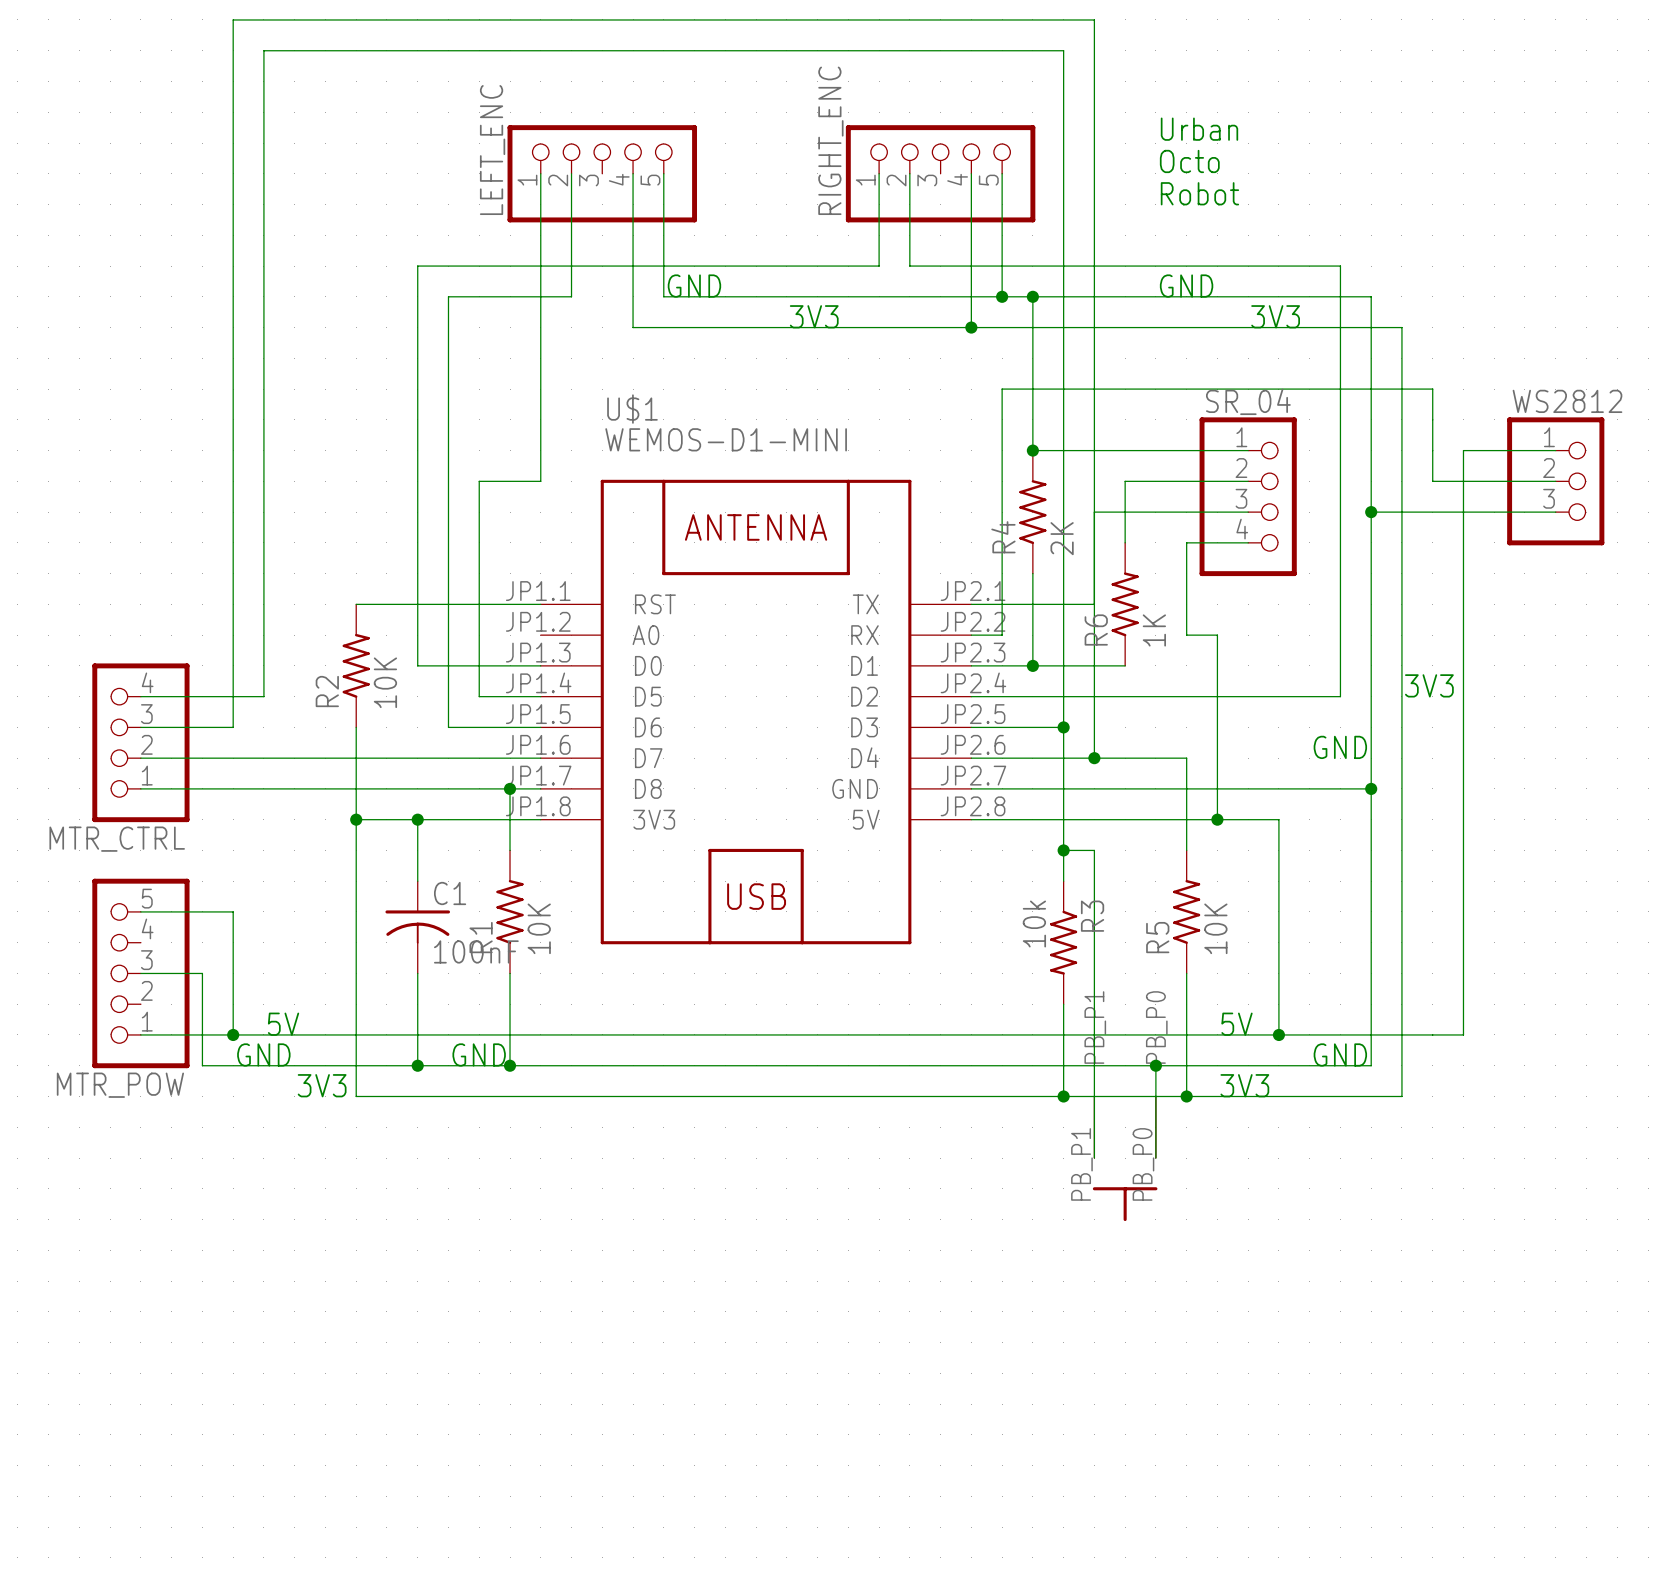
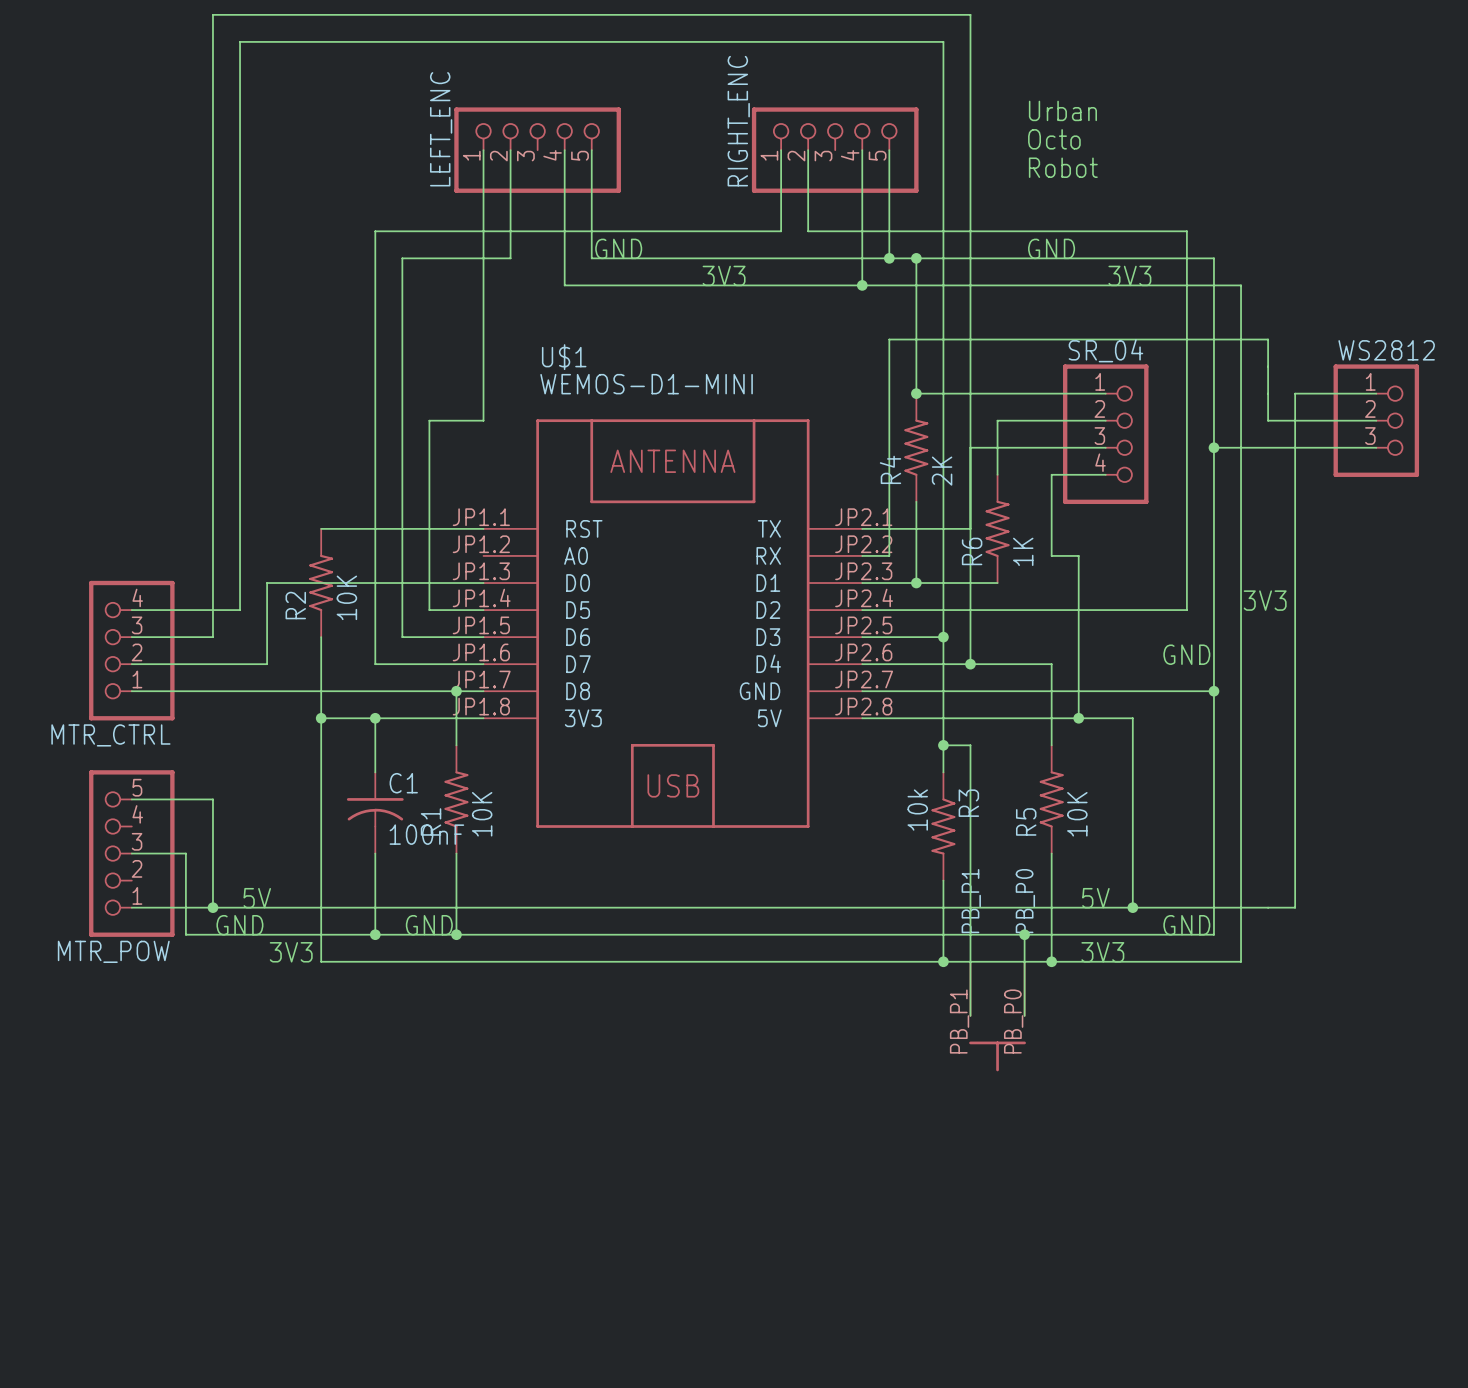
wire: (294, 758) (417, 758) -> (267, 664) (267, 583) (375, 583) (375, 664)

